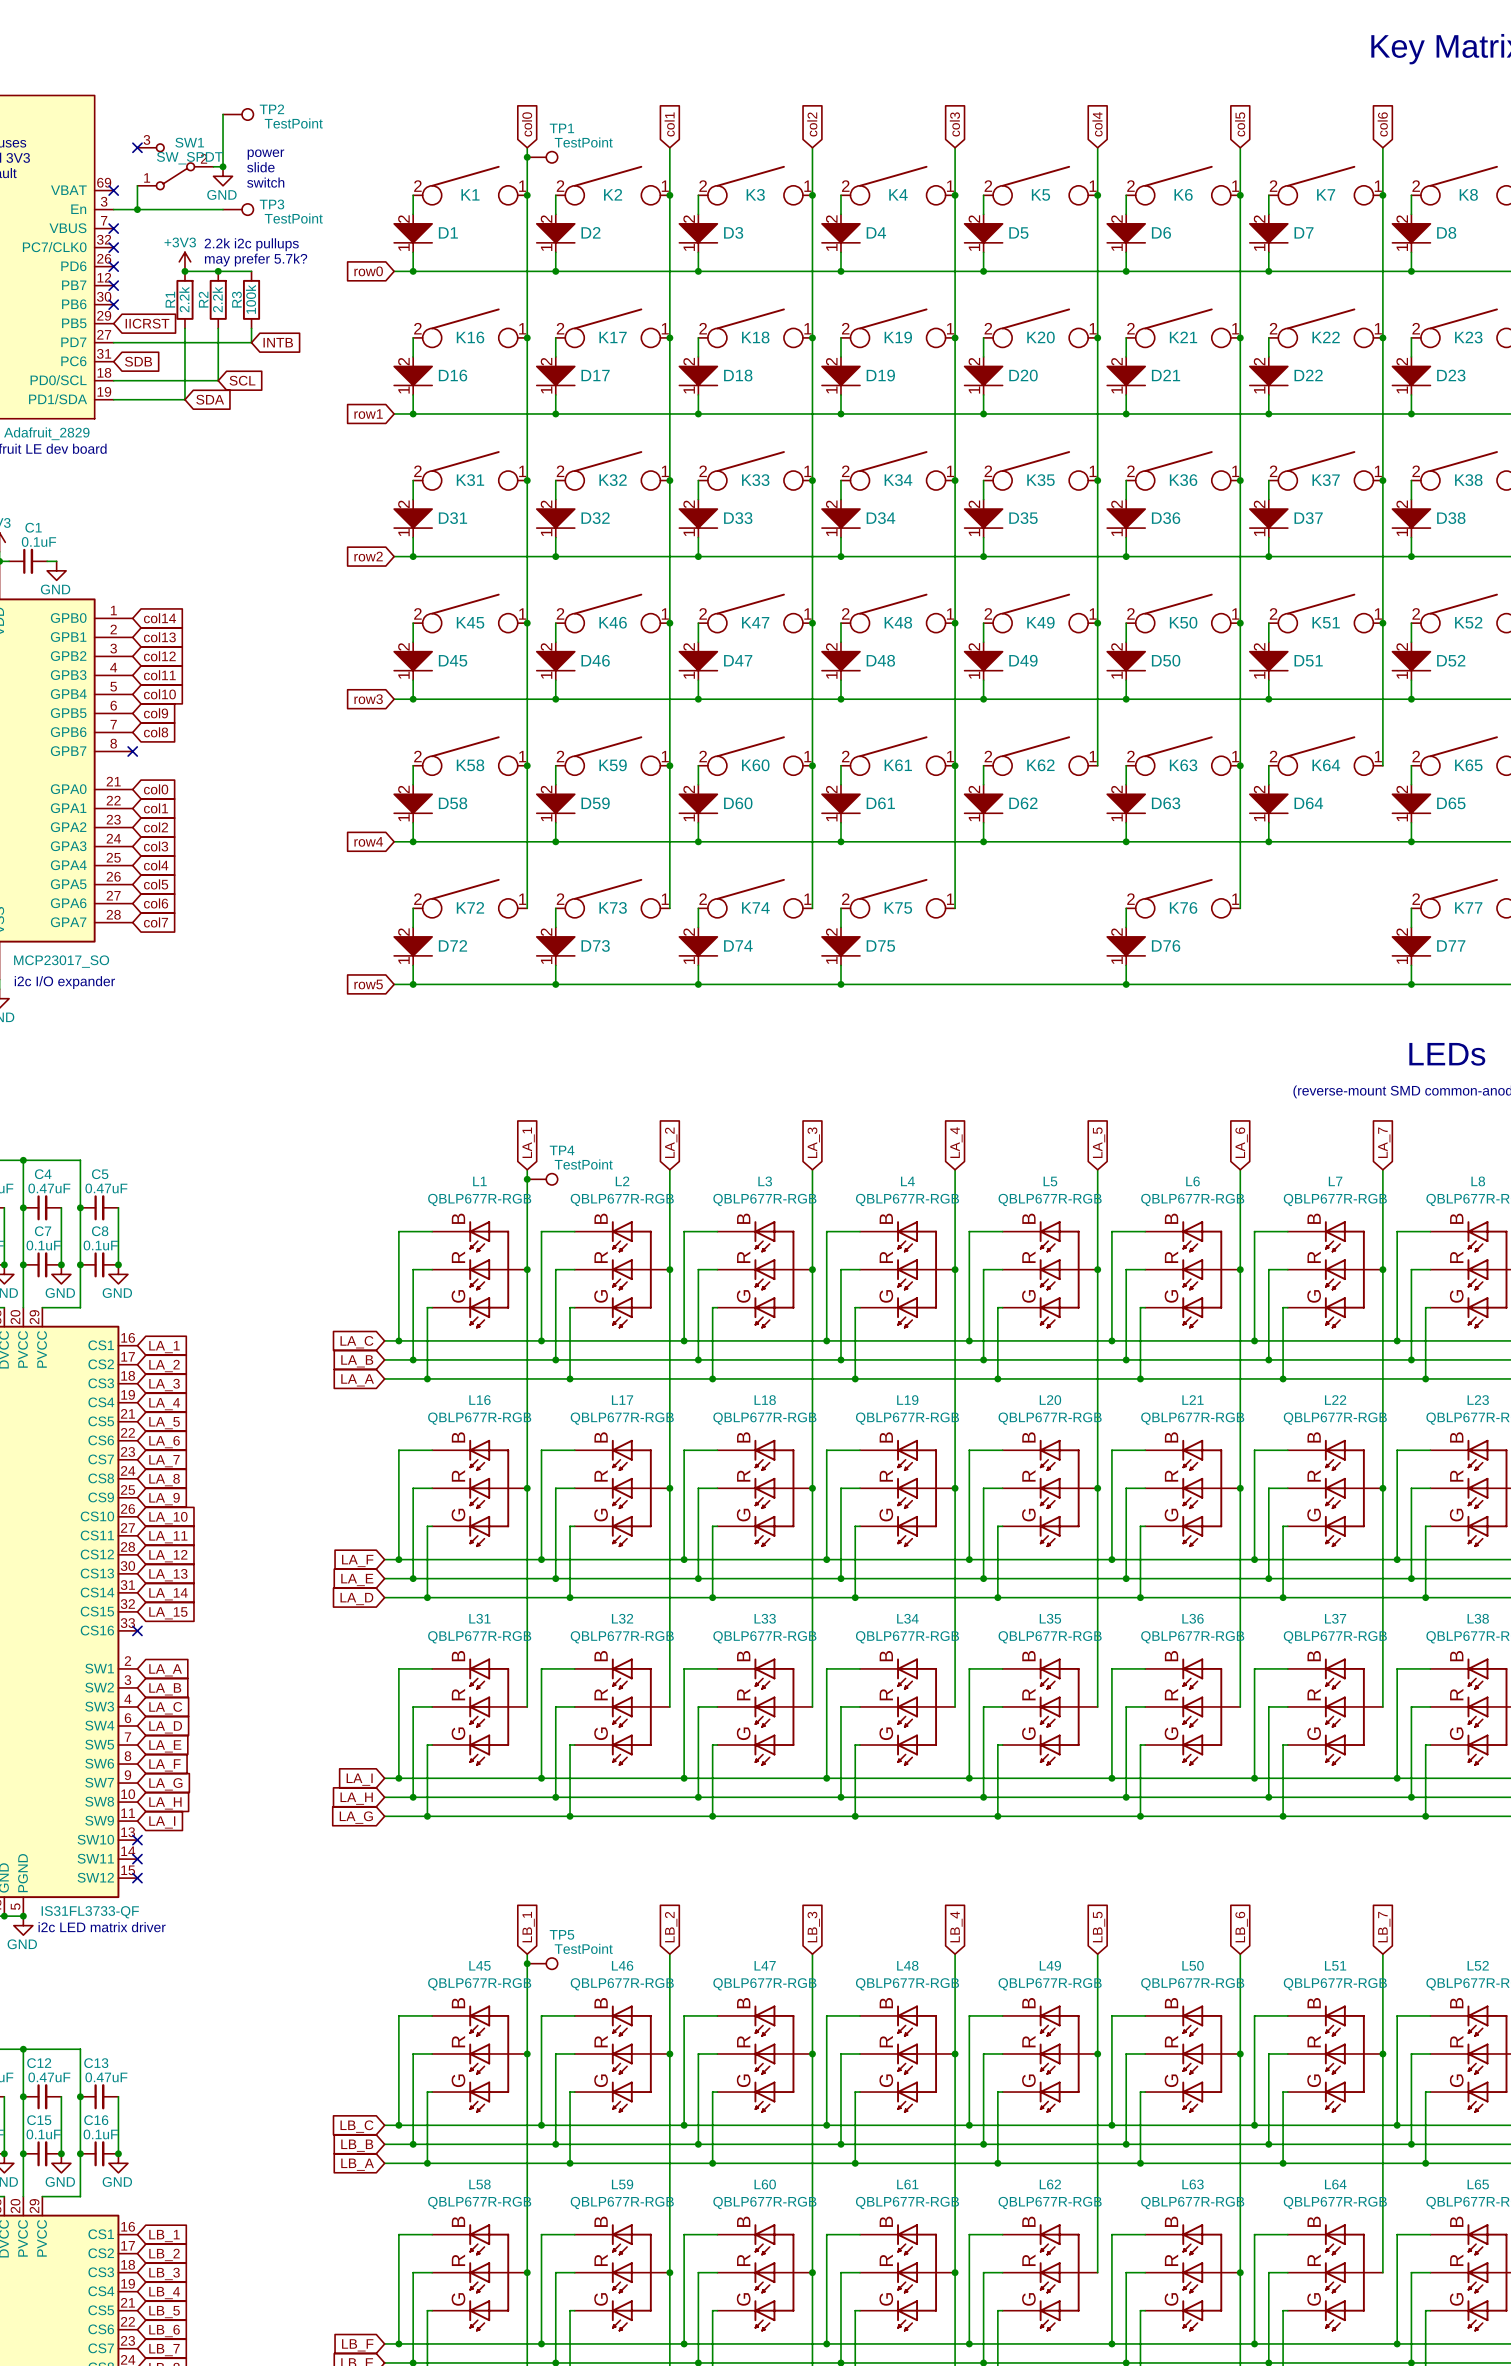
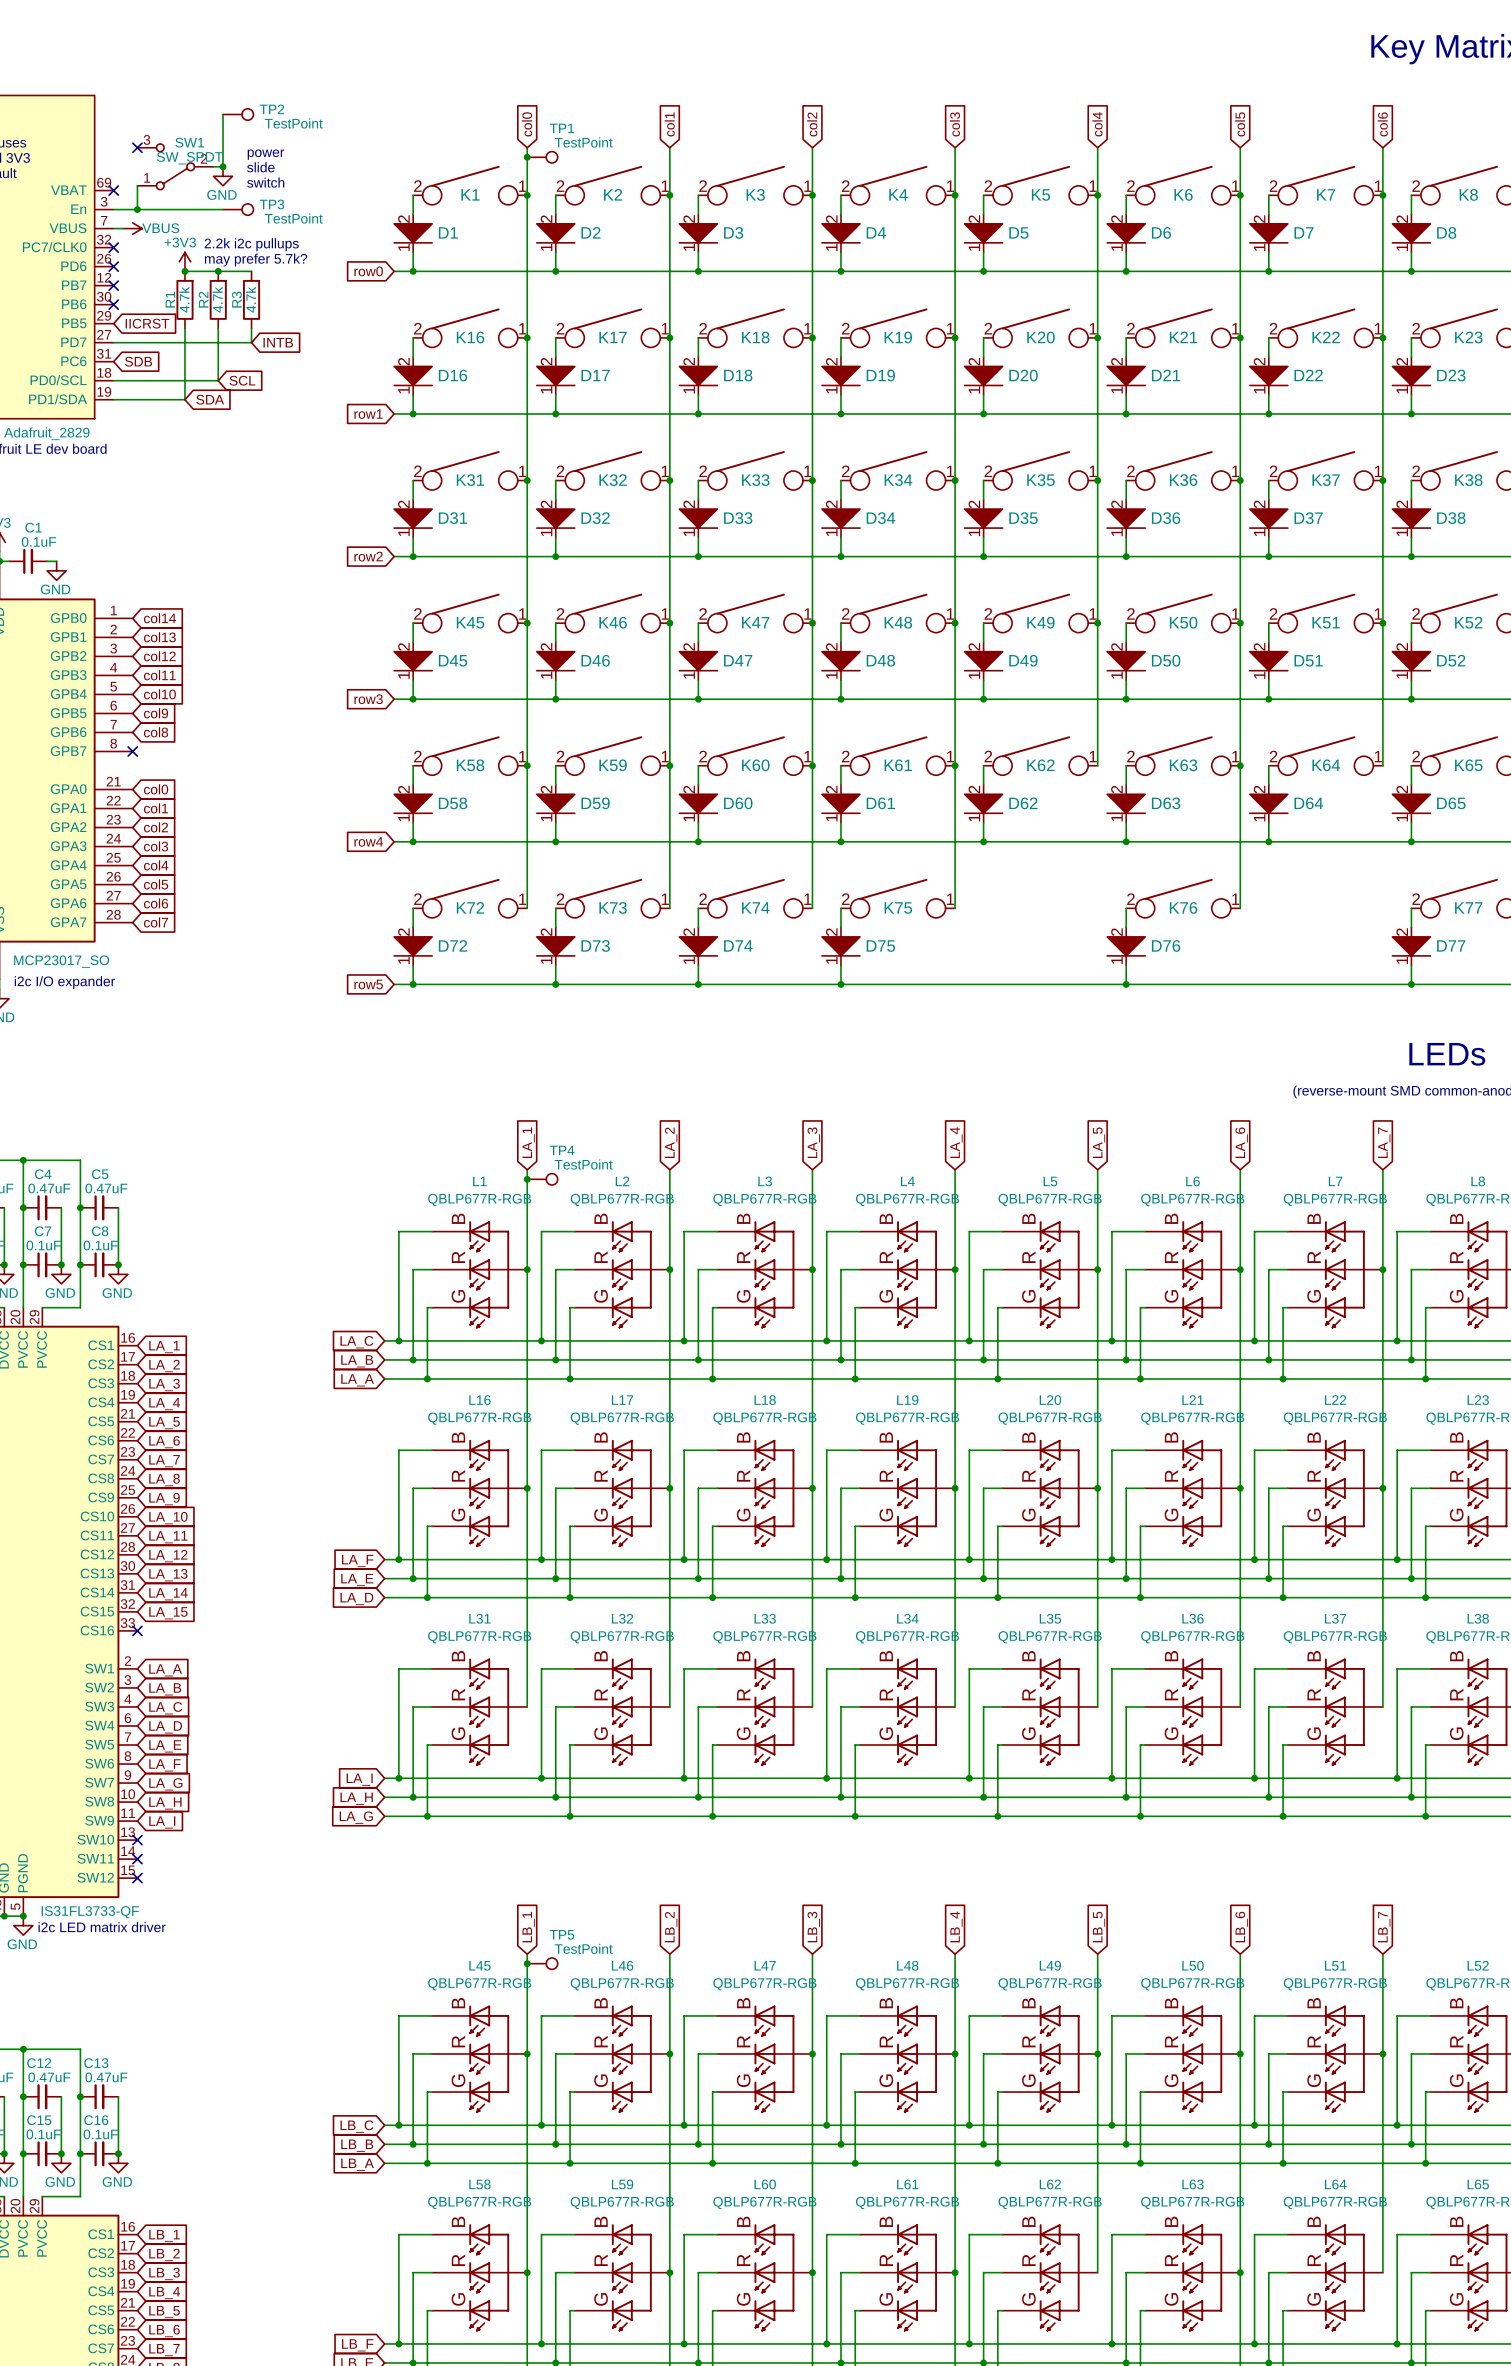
wire: none -> (113, 228) (123, 228)
no-connect mark: (113, 228) -> none
power symbol: none -> VBUS (132, 228)
R1 value: 2.2k (184, 299) -> 4.7k (184, 299)
R2 value: 2.2k (217, 299) -> 4.7k (217, 299)
R3 value: 100k (250, 299) -> 4.7k (250, 299)

